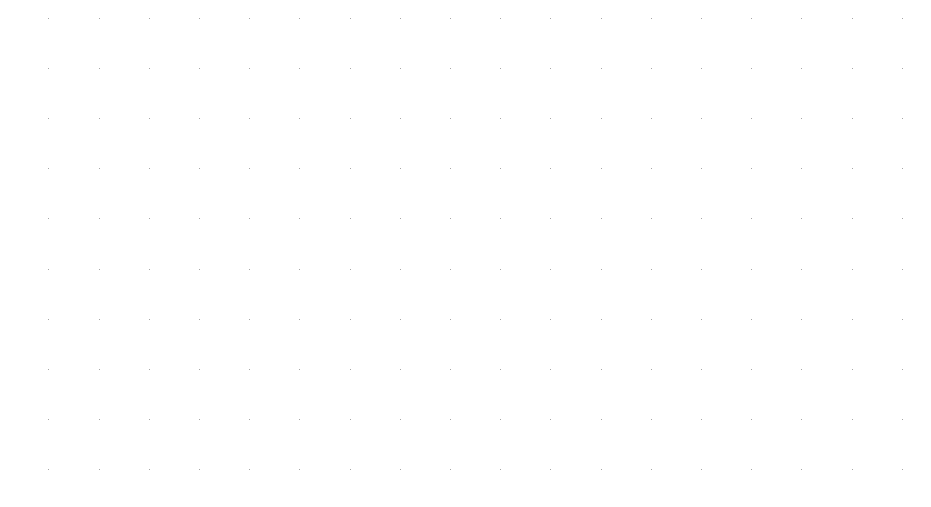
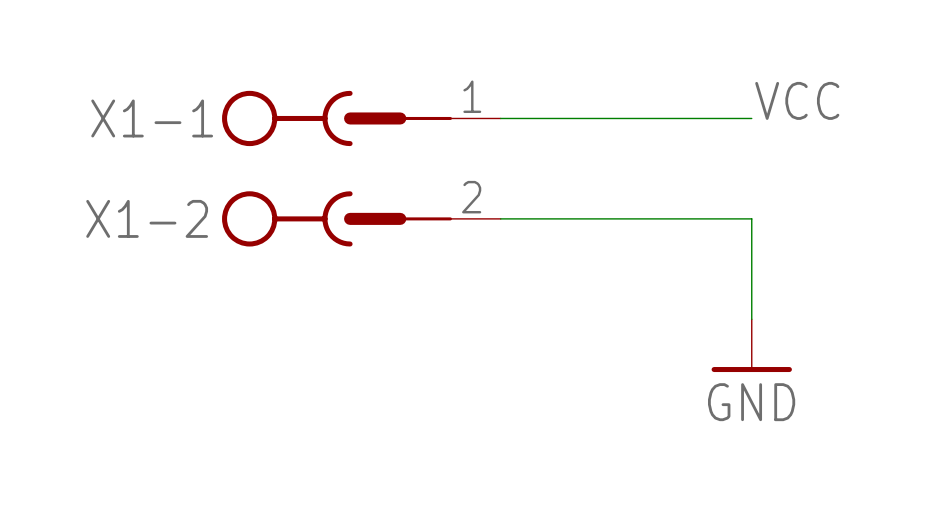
label: none -> VCC (797, 100)
X1-1: none -> (361, 118)
wire: none -> (500, 118) (751, 118)
X1-2: none -> (361, 218)
wire: none -> (500, 218) (751, 218) (751, 319)
power symbol: none -> GND (751, 345)

